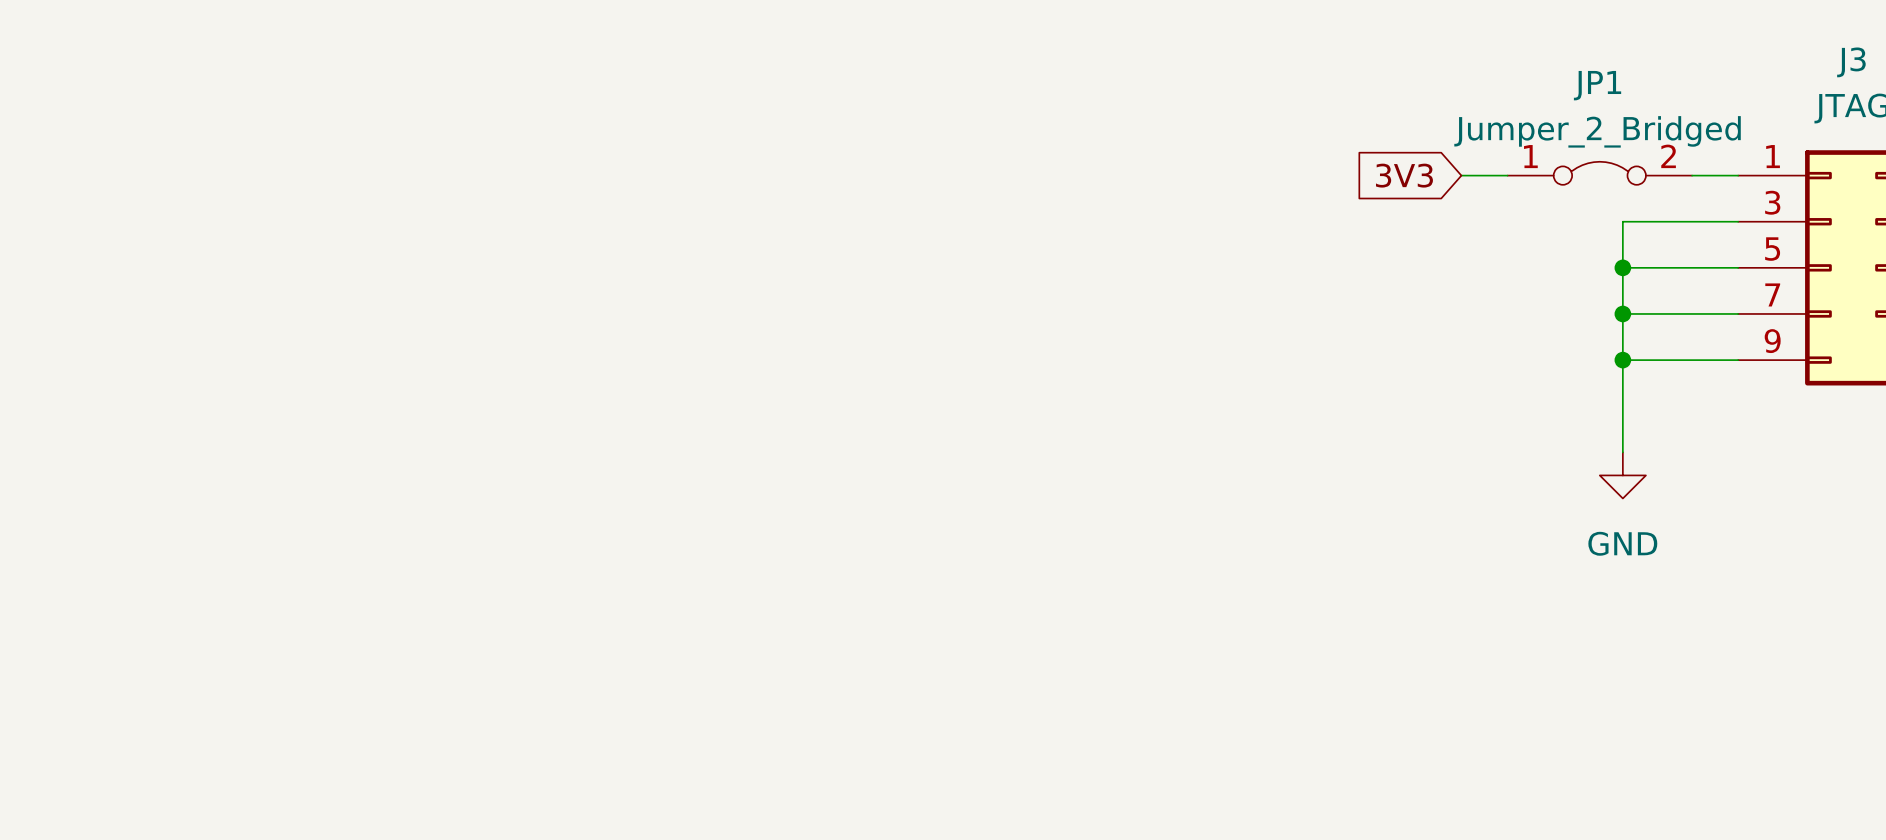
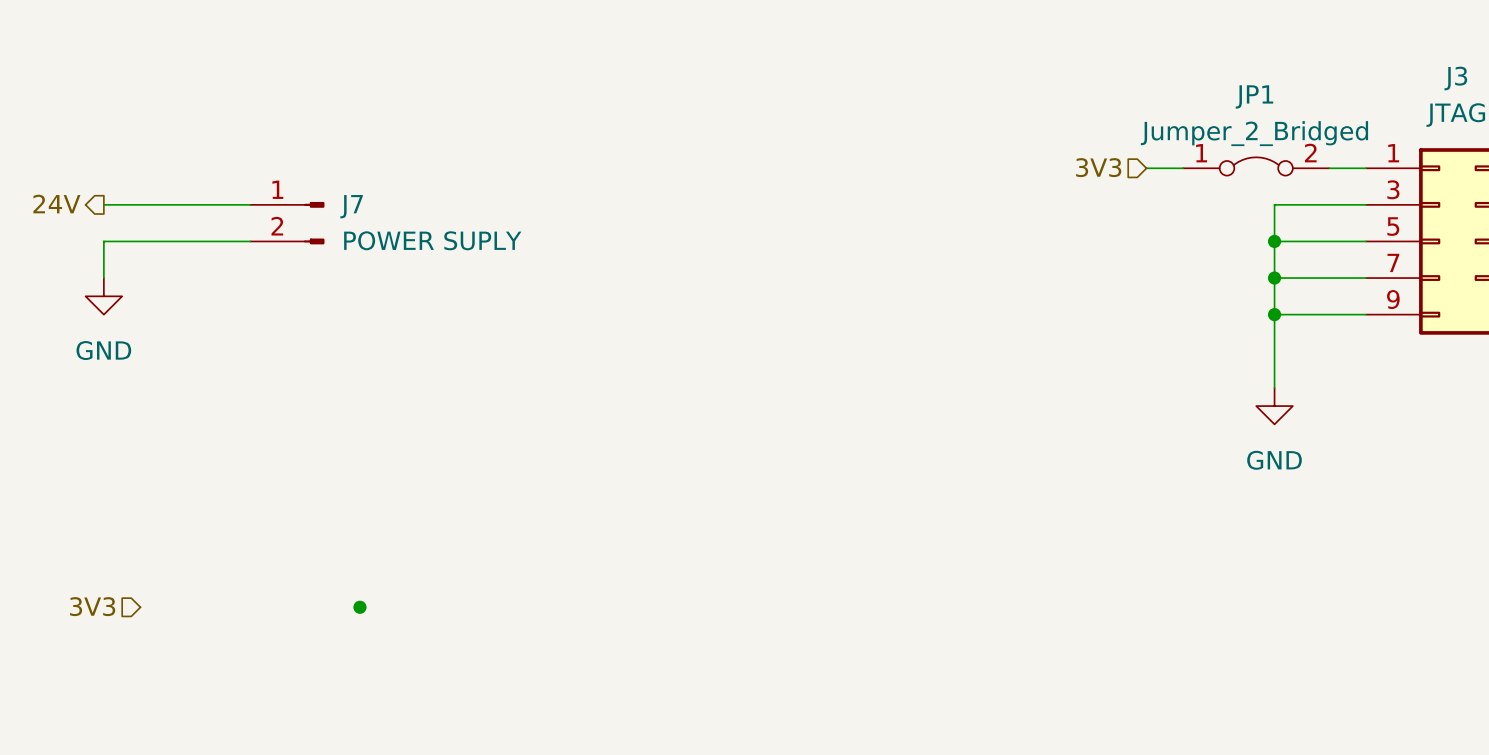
hierarchical label: none -> 3V3 (1098, 167)
global label: 3V3 (1404, 175) -> none
hierarchical label: none -> 24V (56, 204)
wire: none -> (103, 204) (250, 204)
J7: none -> POWER SUPLY (287, 223)
wire: none -> (250, 241) (103, 241) (103, 278)
power symbol: none -> GND (103, 296)
hierarchical label: none -> 3V3 (92, 606)
junction: none -> (359, 607)

